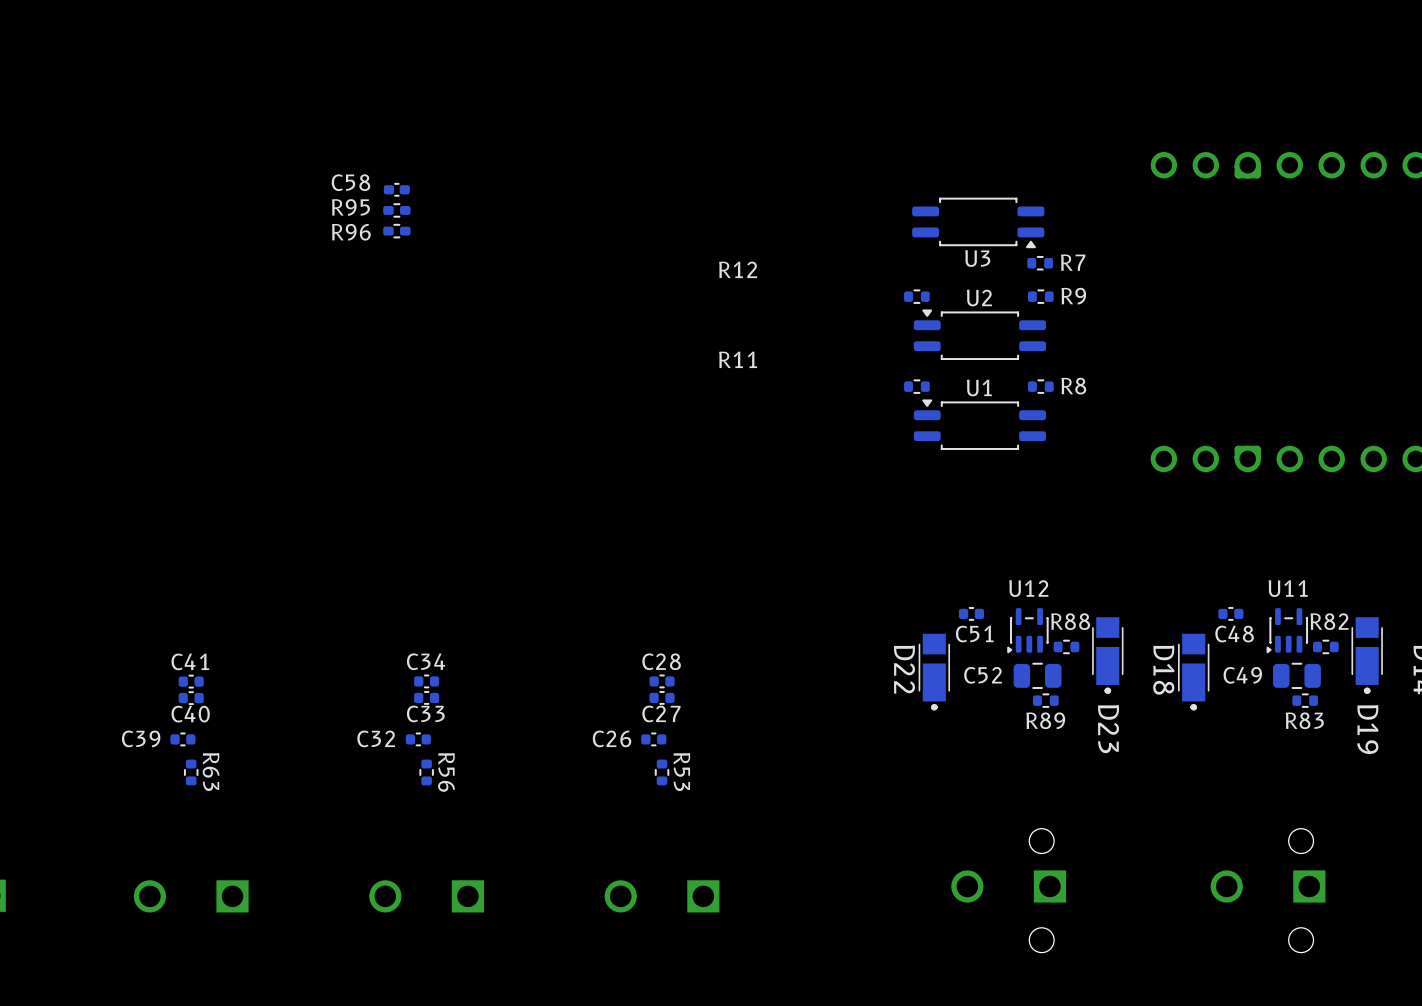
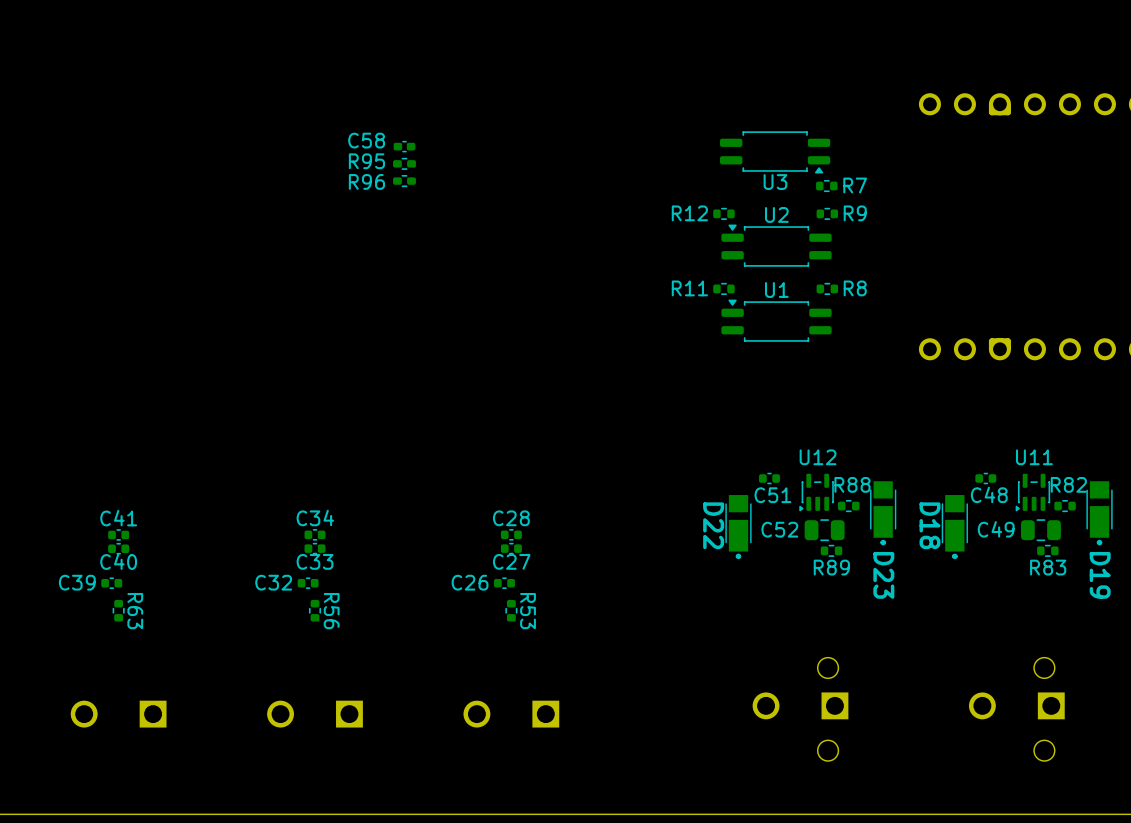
C58 position: (396, 189) -> (404, 146)
R95 position: (396, 210) -> (404, 163)
R96 position: (396, 231) -> (404, 181)
R12 name position: R12 (738, 269) -> R12 (689, 213)
R11 name position: R11 (738, 359) -> R11 (689, 288)

